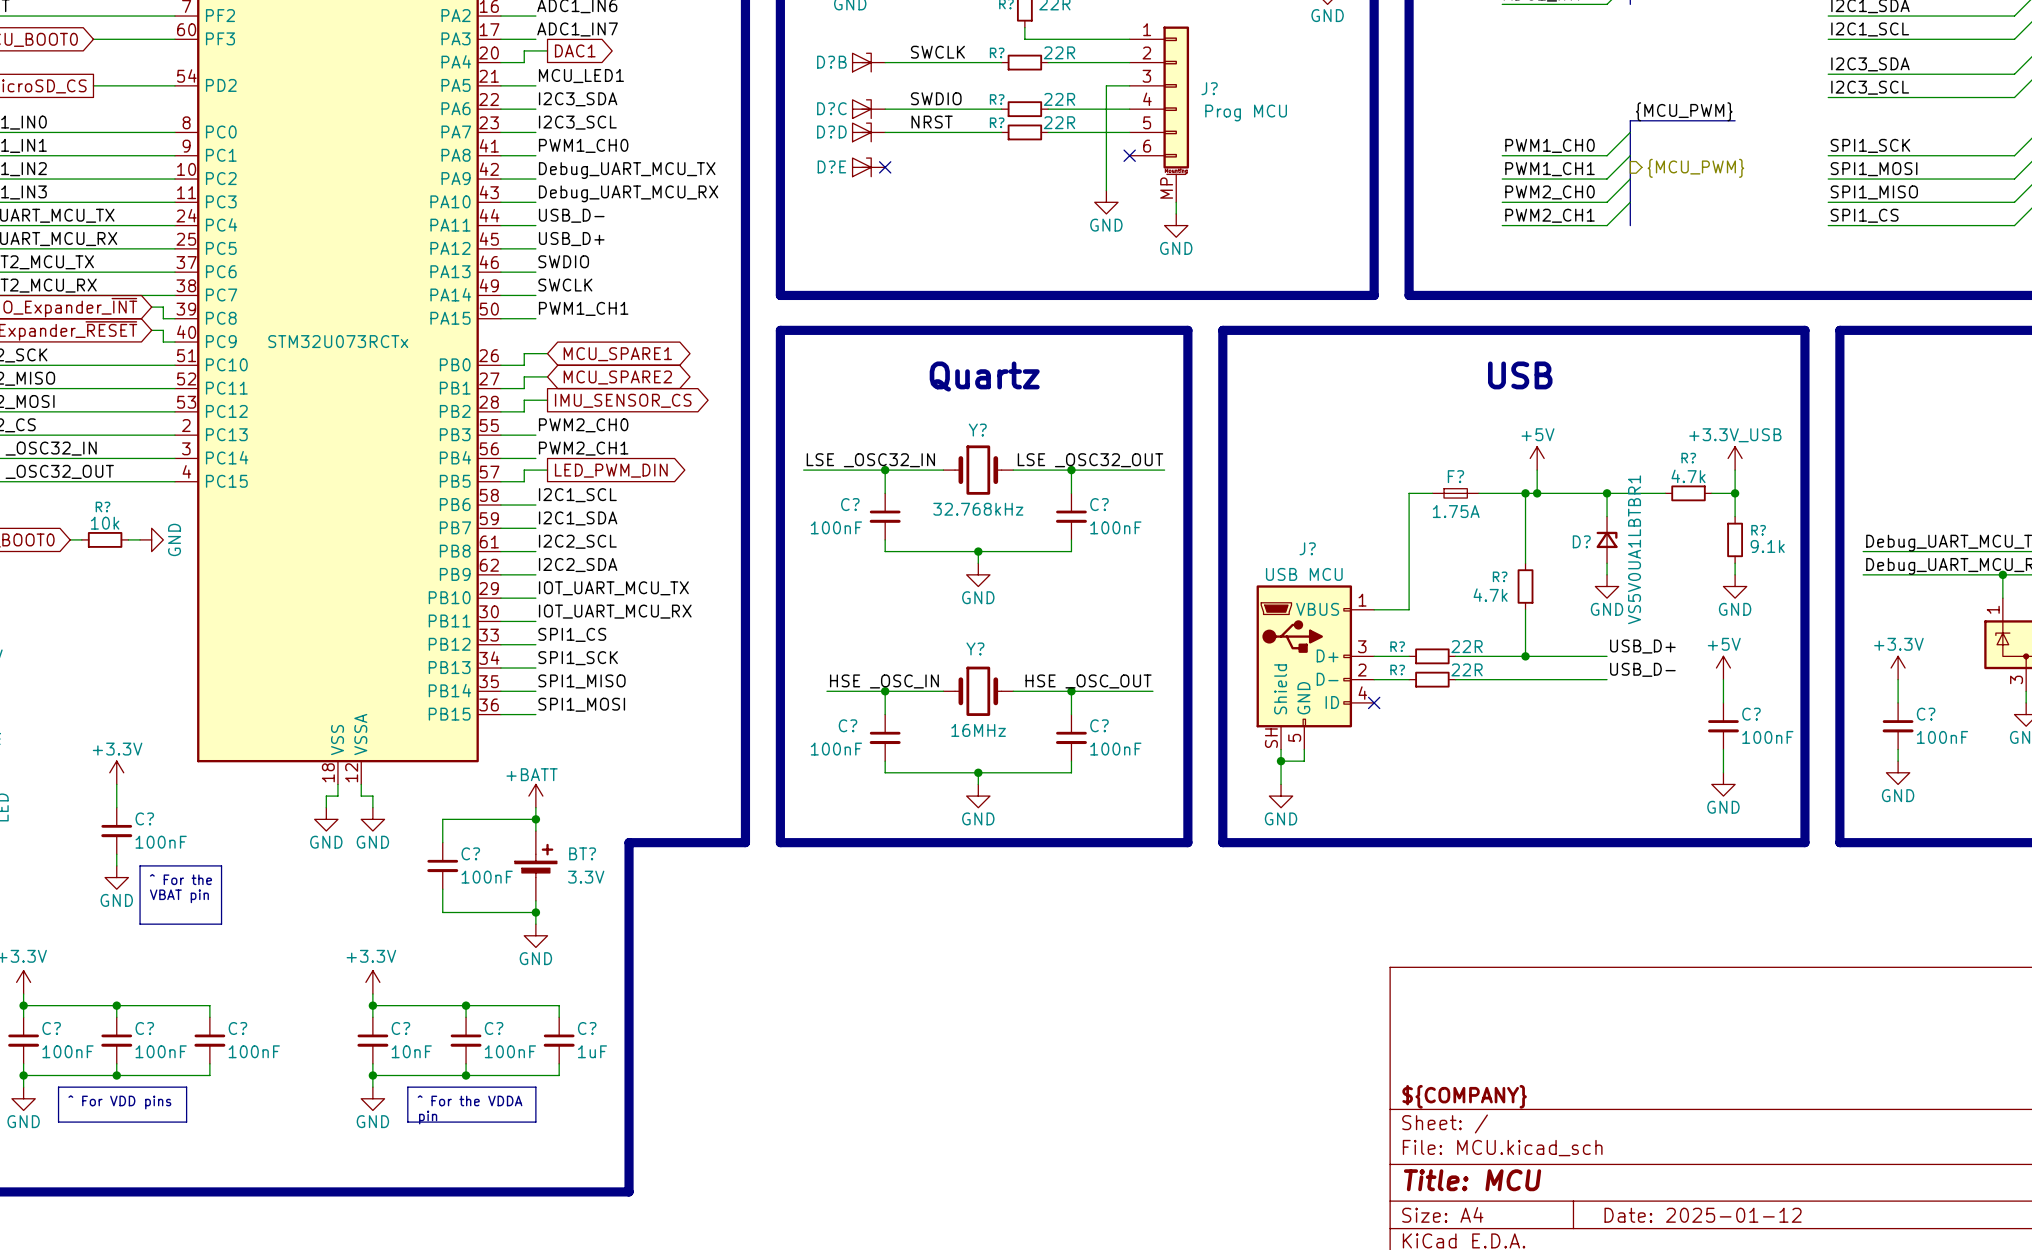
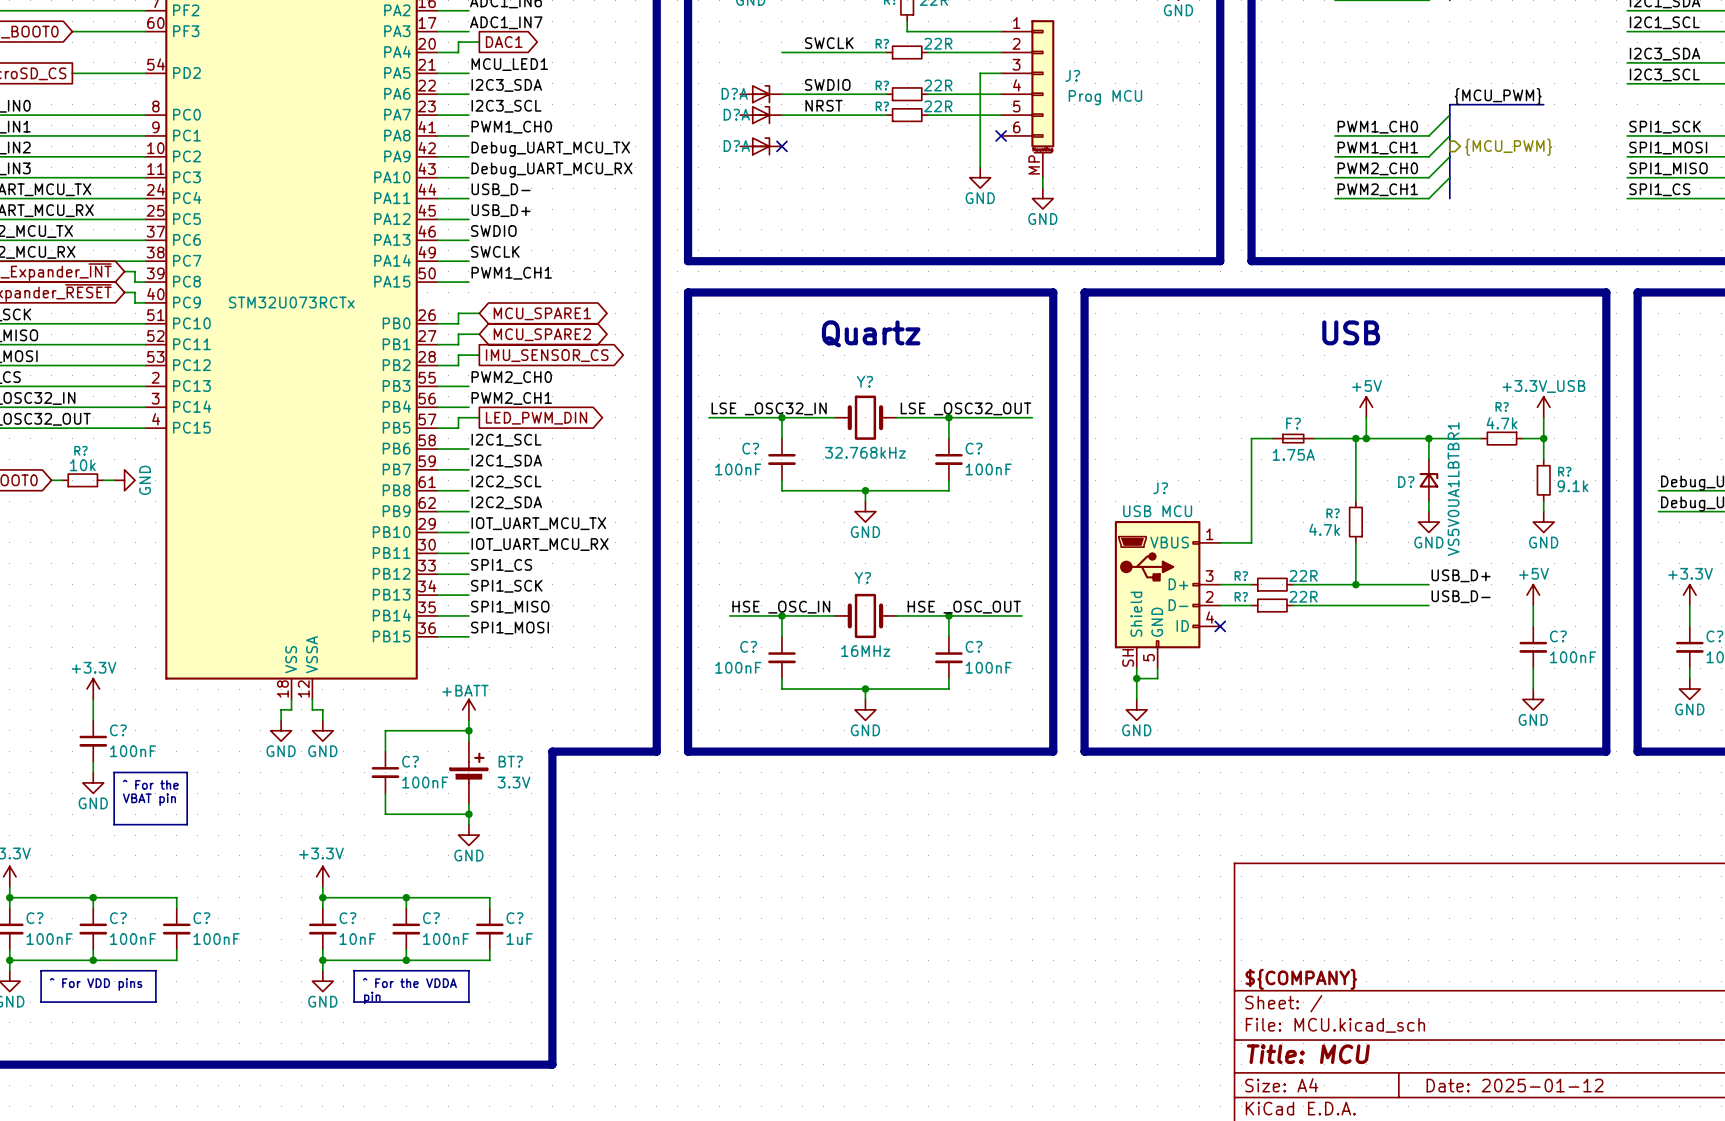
D?B: (868, 62) -> none
D?A: none -> (761, 94)
D?C: (868, 109) -> none
D?A: none -> (761, 115)
D?D: (868, 132) -> none
D?A: none -> (761, 146)
D?E: (868, 167) -> none

